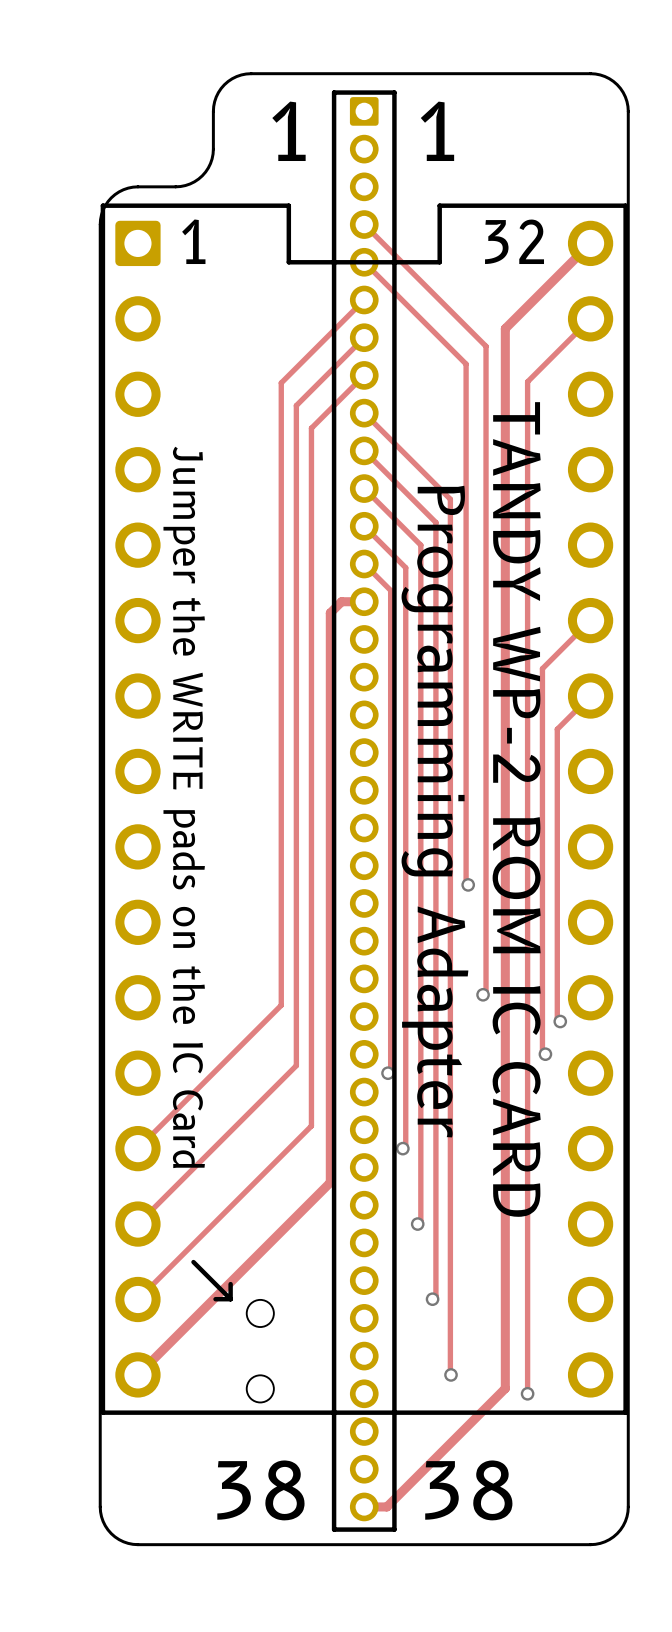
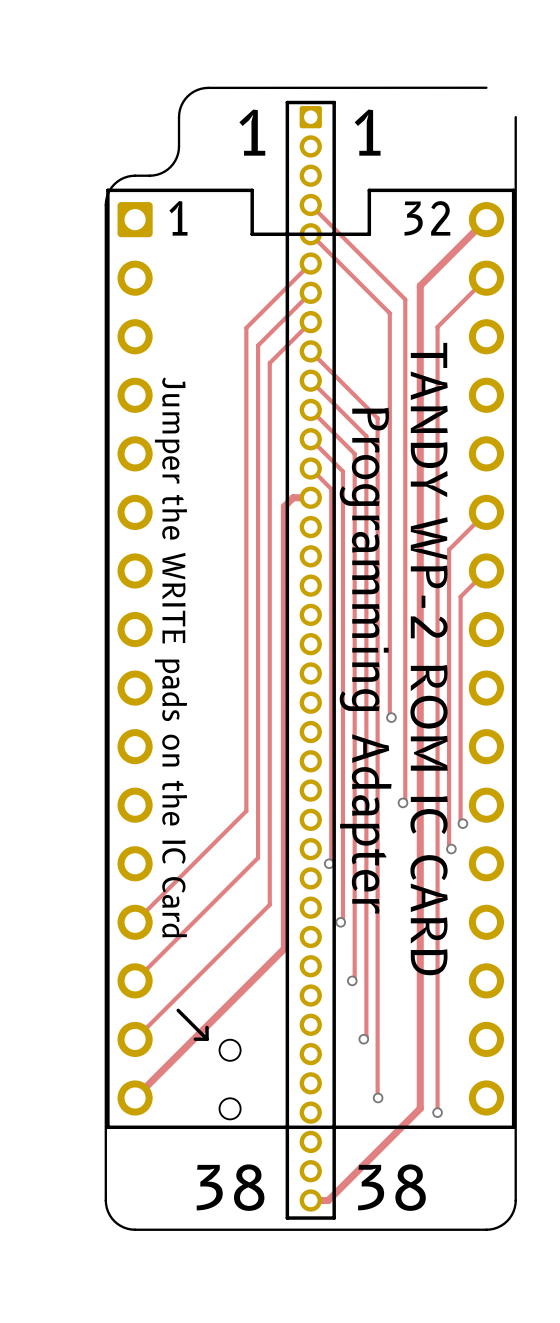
board edge: (628, 111) (626, 101) (620, 88) (609, 78) (595, 74) (246, 74) (228, 81) (216, 96) (213, 111) (213, 154) (205, 172) (194, 181) (185, 185) (156, 186) -> (486, 87) (200, 88) (187, 96) (181, 105) (179, 117) (178, 150) (175, 161) (164, 171) (149, 175)

